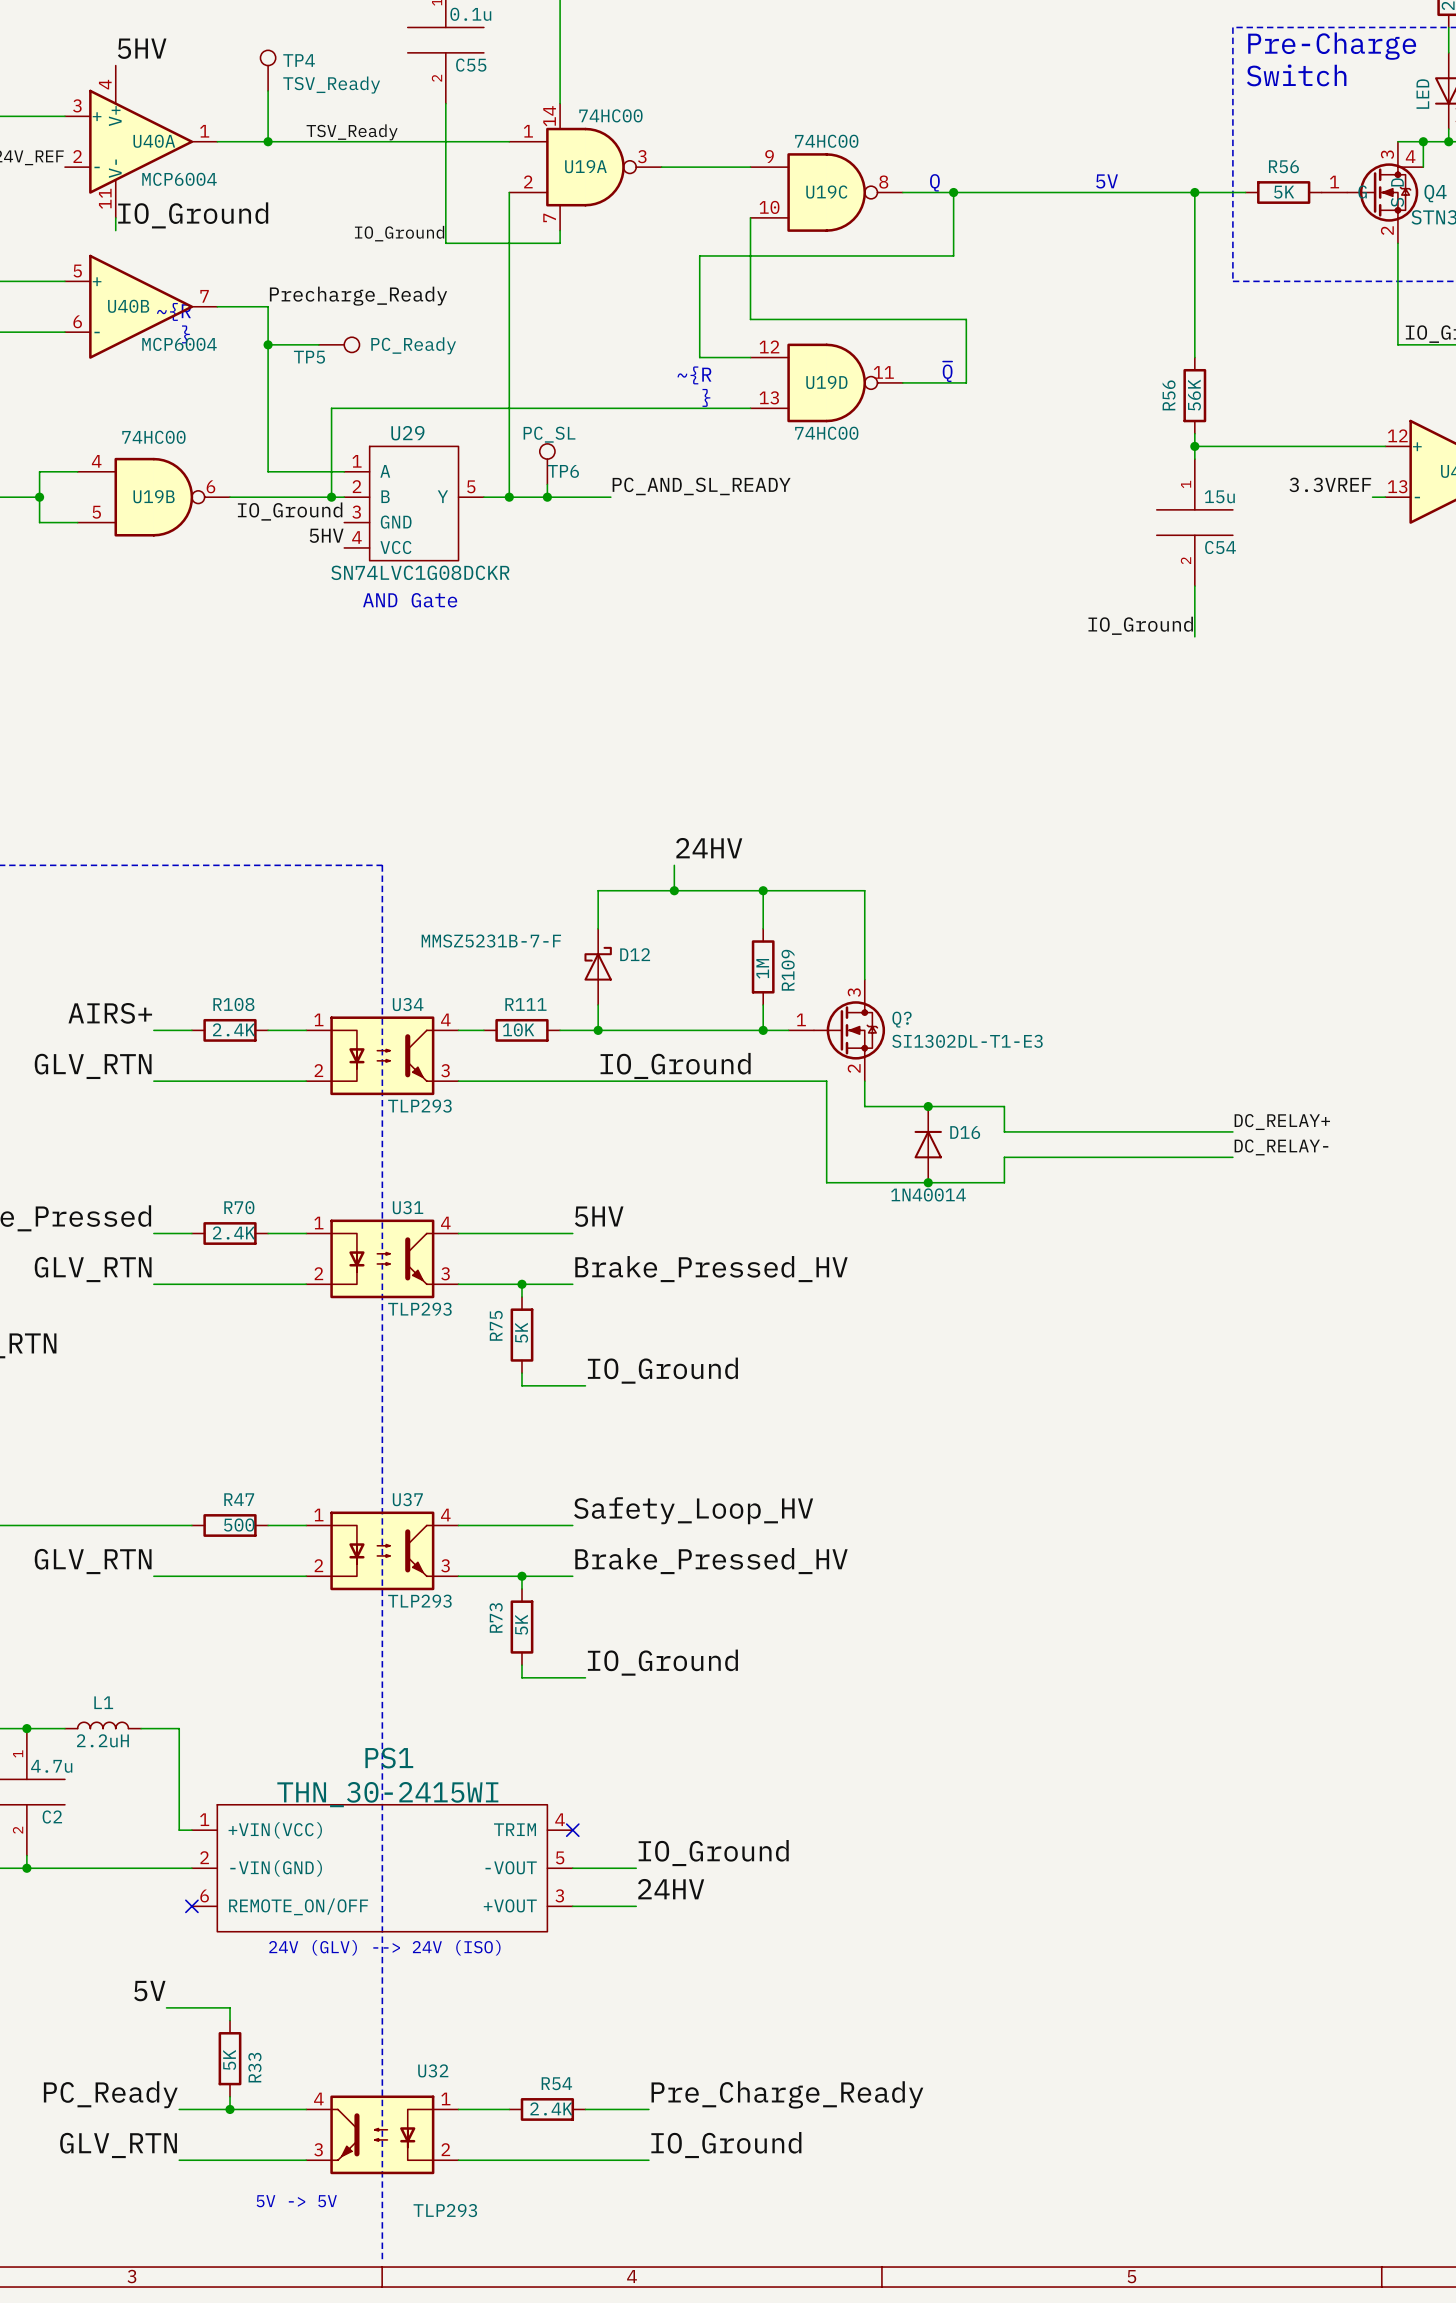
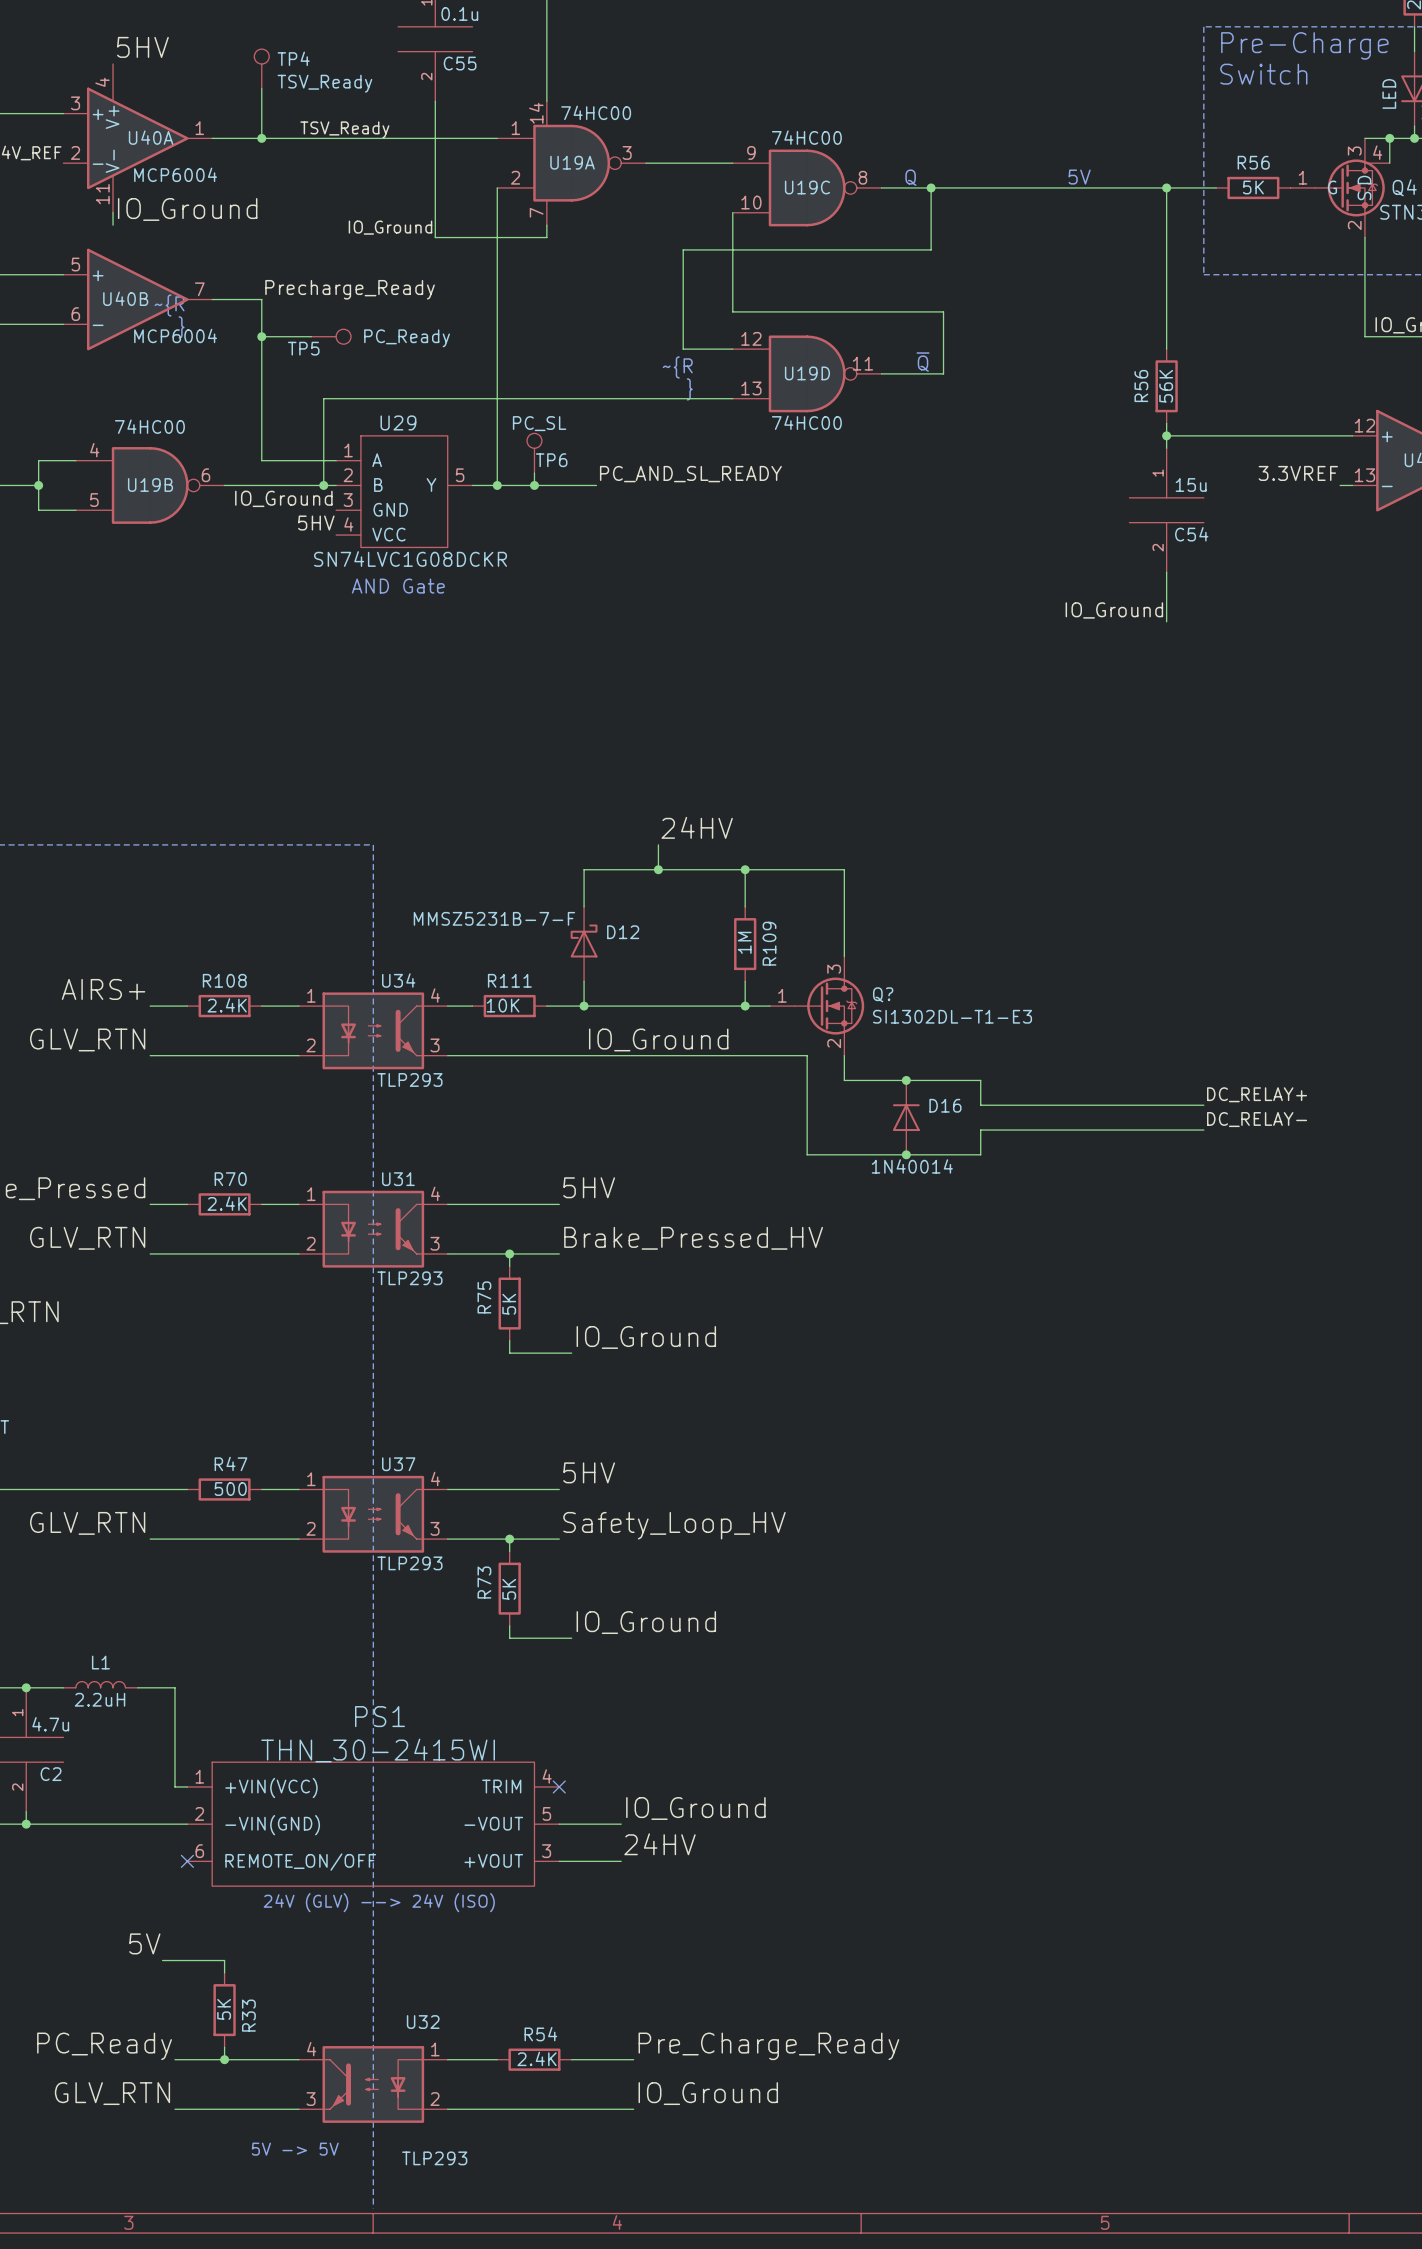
label: Safety_Loop_HV (693, 1510) -> 5HV (589, 1472)
label: Brake_Pressed_HV (711, 1561) -> Safety_Loop_HV (674, 1525)

